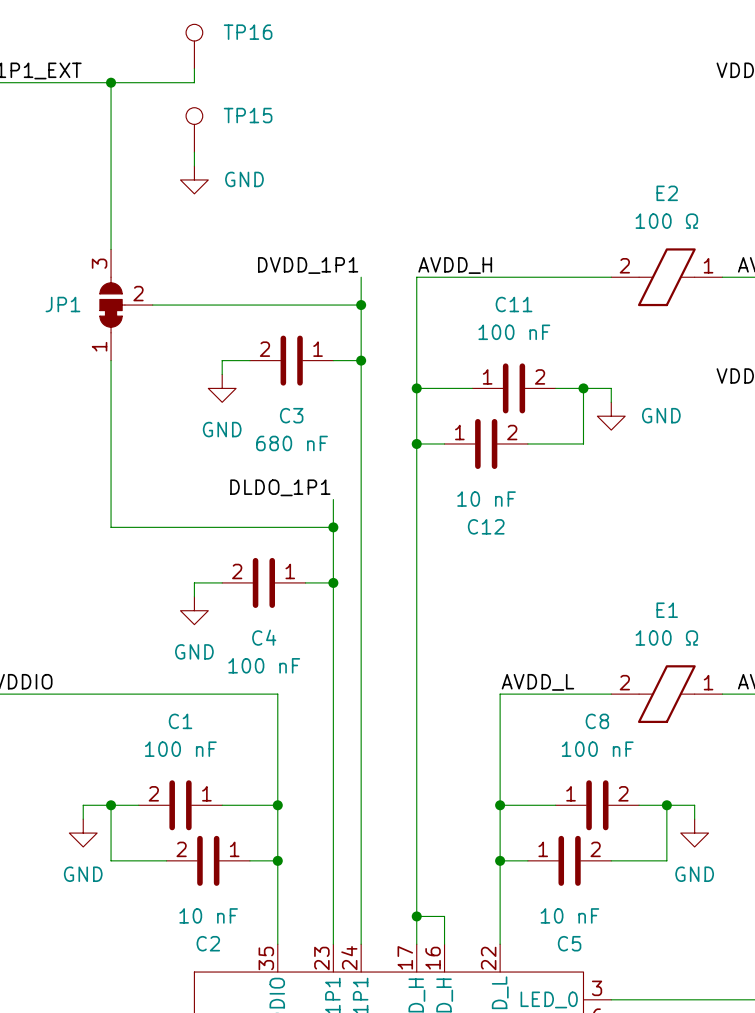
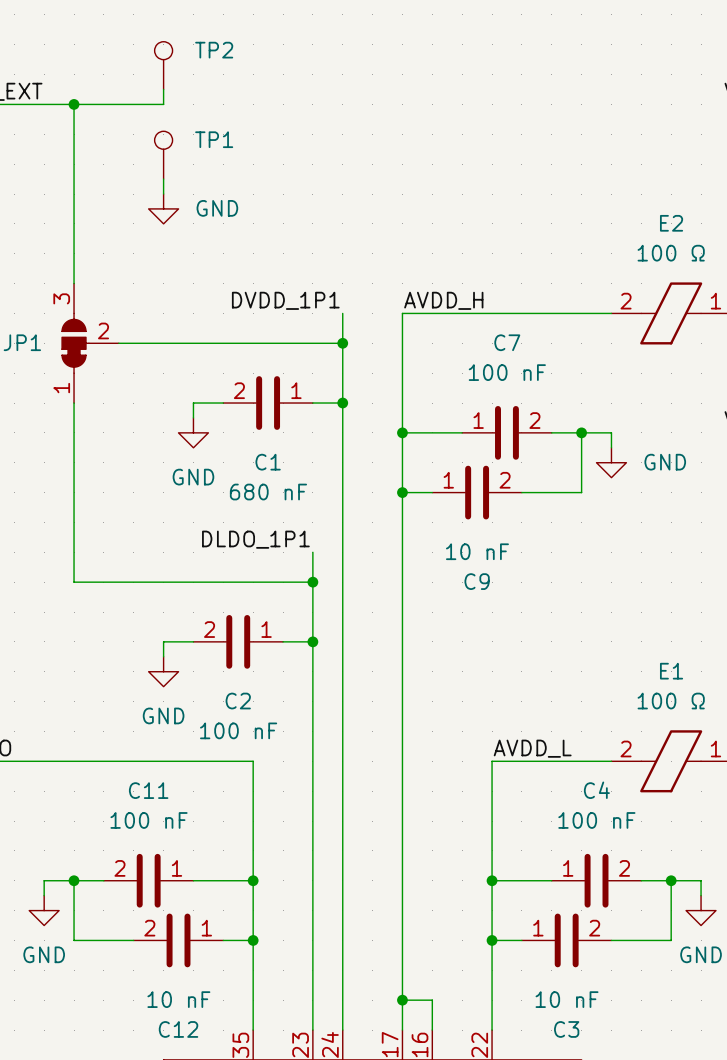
TP16 name: TP16 (248, 32) -> TP2 (214, 50)
TP15 name: TP15 (248, 115) -> TP1 (214, 139)
C11 name: C11 (514, 304) -> C7 (507, 342)
C3 name: C3 (291, 415) -> C1 (268, 462)
C12 name: C12 (486, 526) -> C9 (477, 581)
C4 name: C4 (264, 637) -> C2 (238, 701)
C1 name: C1 (180, 721) -> C11 (148, 790)
C8 name: C8 (597, 721) -> C4 (596, 790)
C2 name: C2 (208, 943) -> C12 (178, 1029)
C5 name: C5 (569, 943) -> C3 (566, 1029)

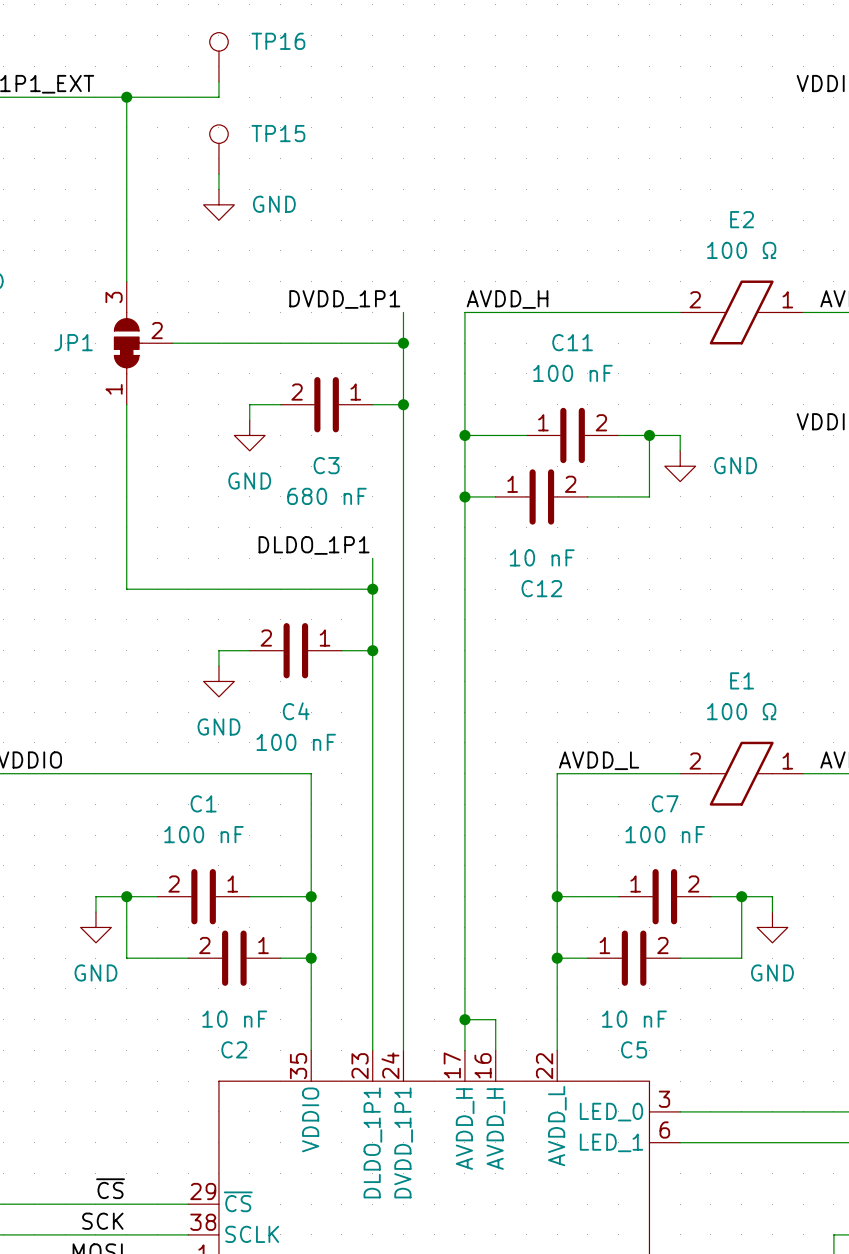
TP2 name: TP2 (214, 50) -> TP16 (278, 41)
TP1 name: TP1 (214, 139) -> TP15 (278, 133)
C7 name: C7 (507, 342) -> C11 (572, 342)
C1 name: C1 (268, 462) -> C3 (326, 465)
C9 name: C9 (477, 581) -> C12 (541, 588)
C2 name: C2 (238, 701) -> C4 (296, 711)
C11 name: C11 (148, 790) -> C1 (203, 803)
C4 name: C4 (596, 790) -> C7 (665, 803)
C12 name: C12 (178, 1029) -> C2 (234, 1049)
C3 name: C3 (566, 1029) -> C5 (634, 1049)

